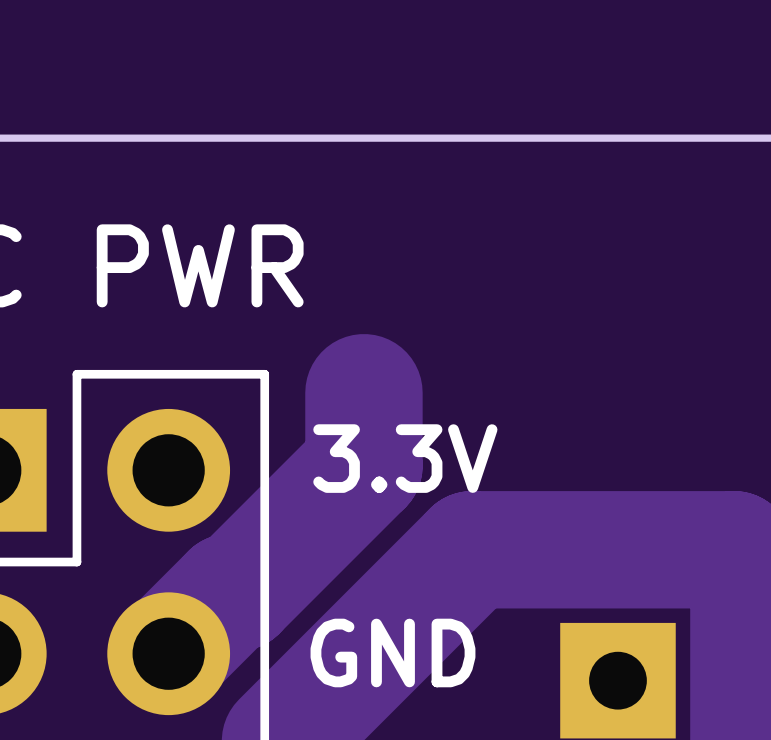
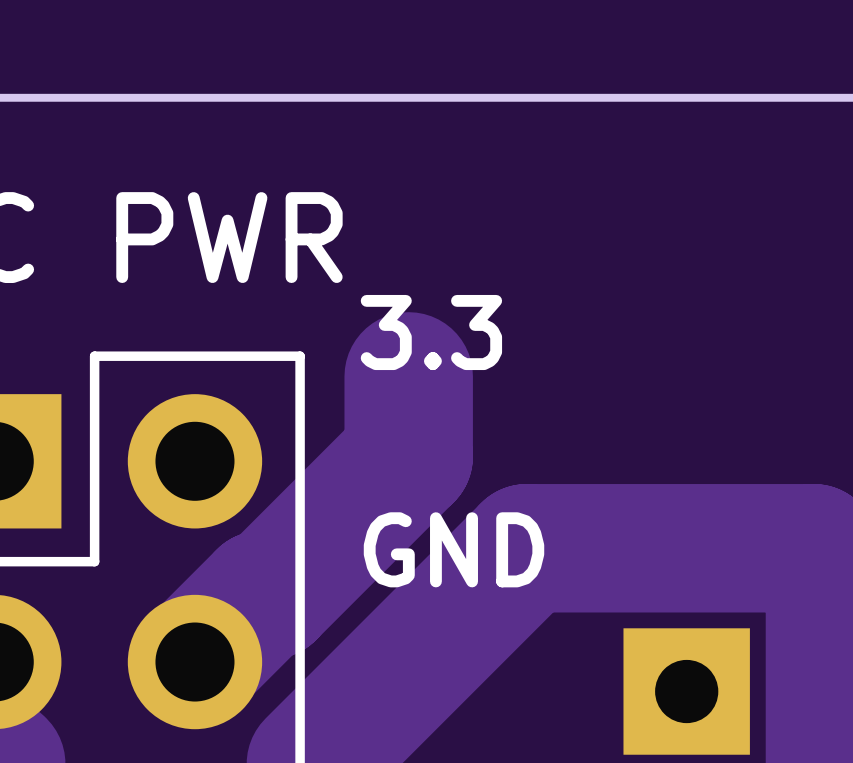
text: 3.3V (405, 458) -> 3.3 (431, 332)
text position: GND (392, 652) -> GND (454, 549)

